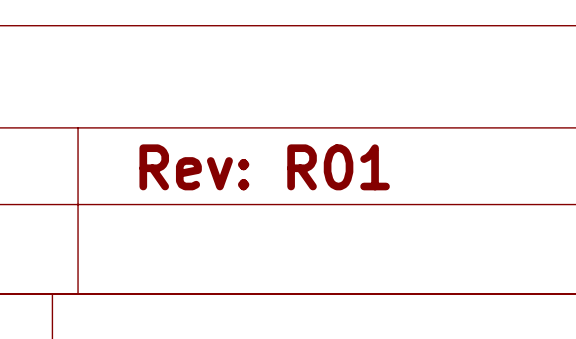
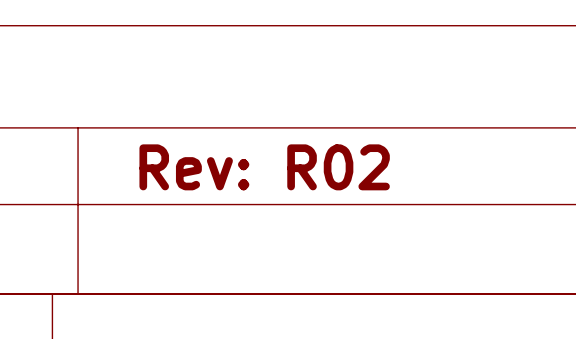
title block: Rev: R01 (264, 167) -> Rev: R02 (264, 167)

